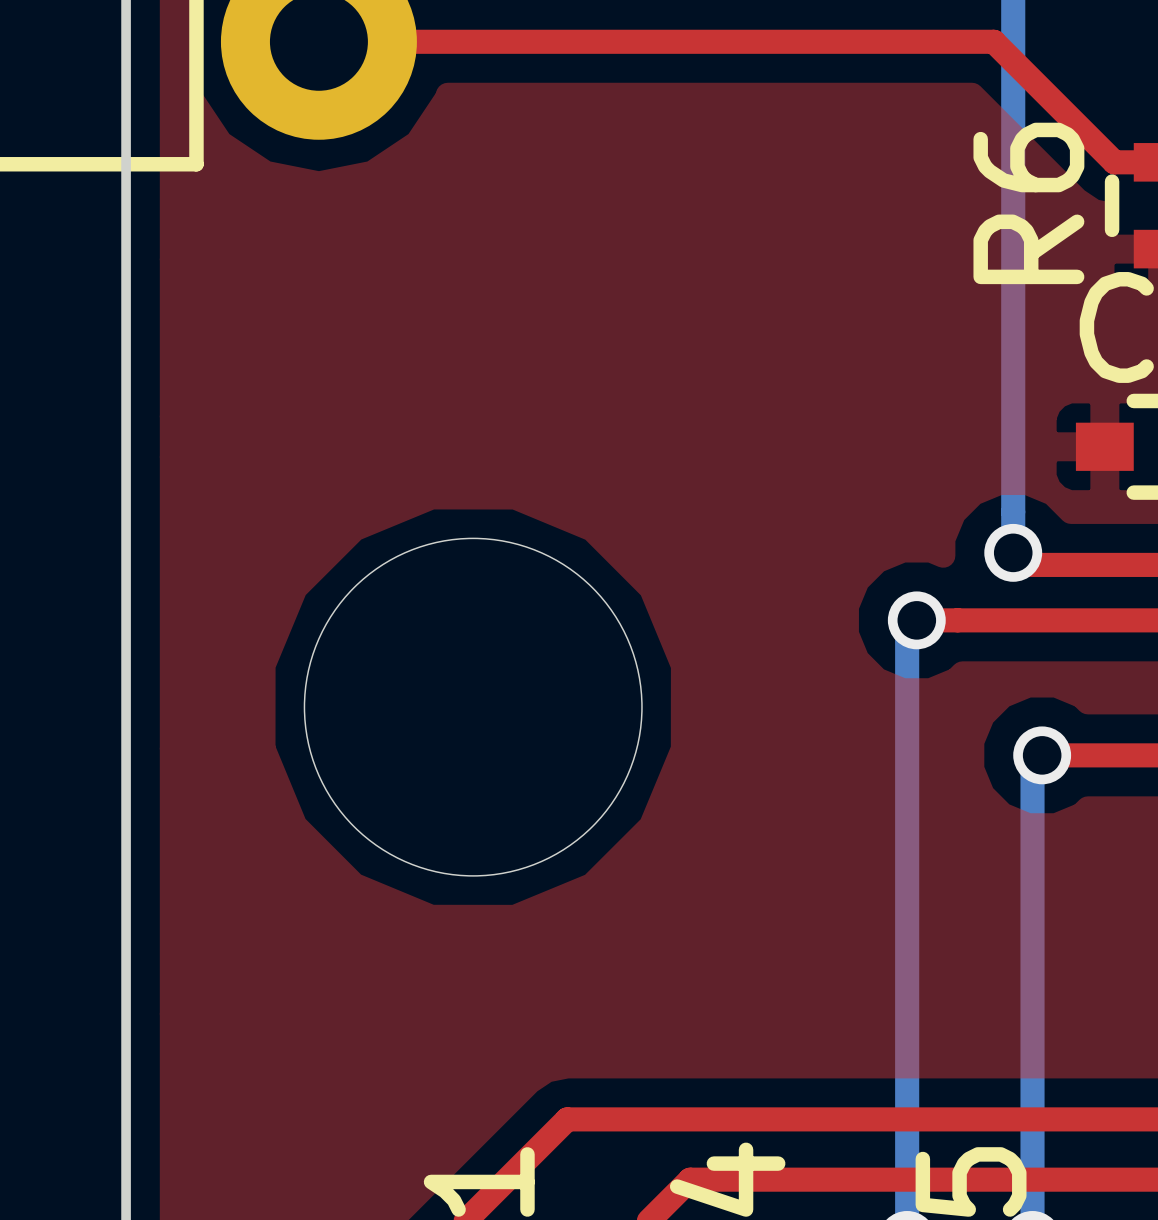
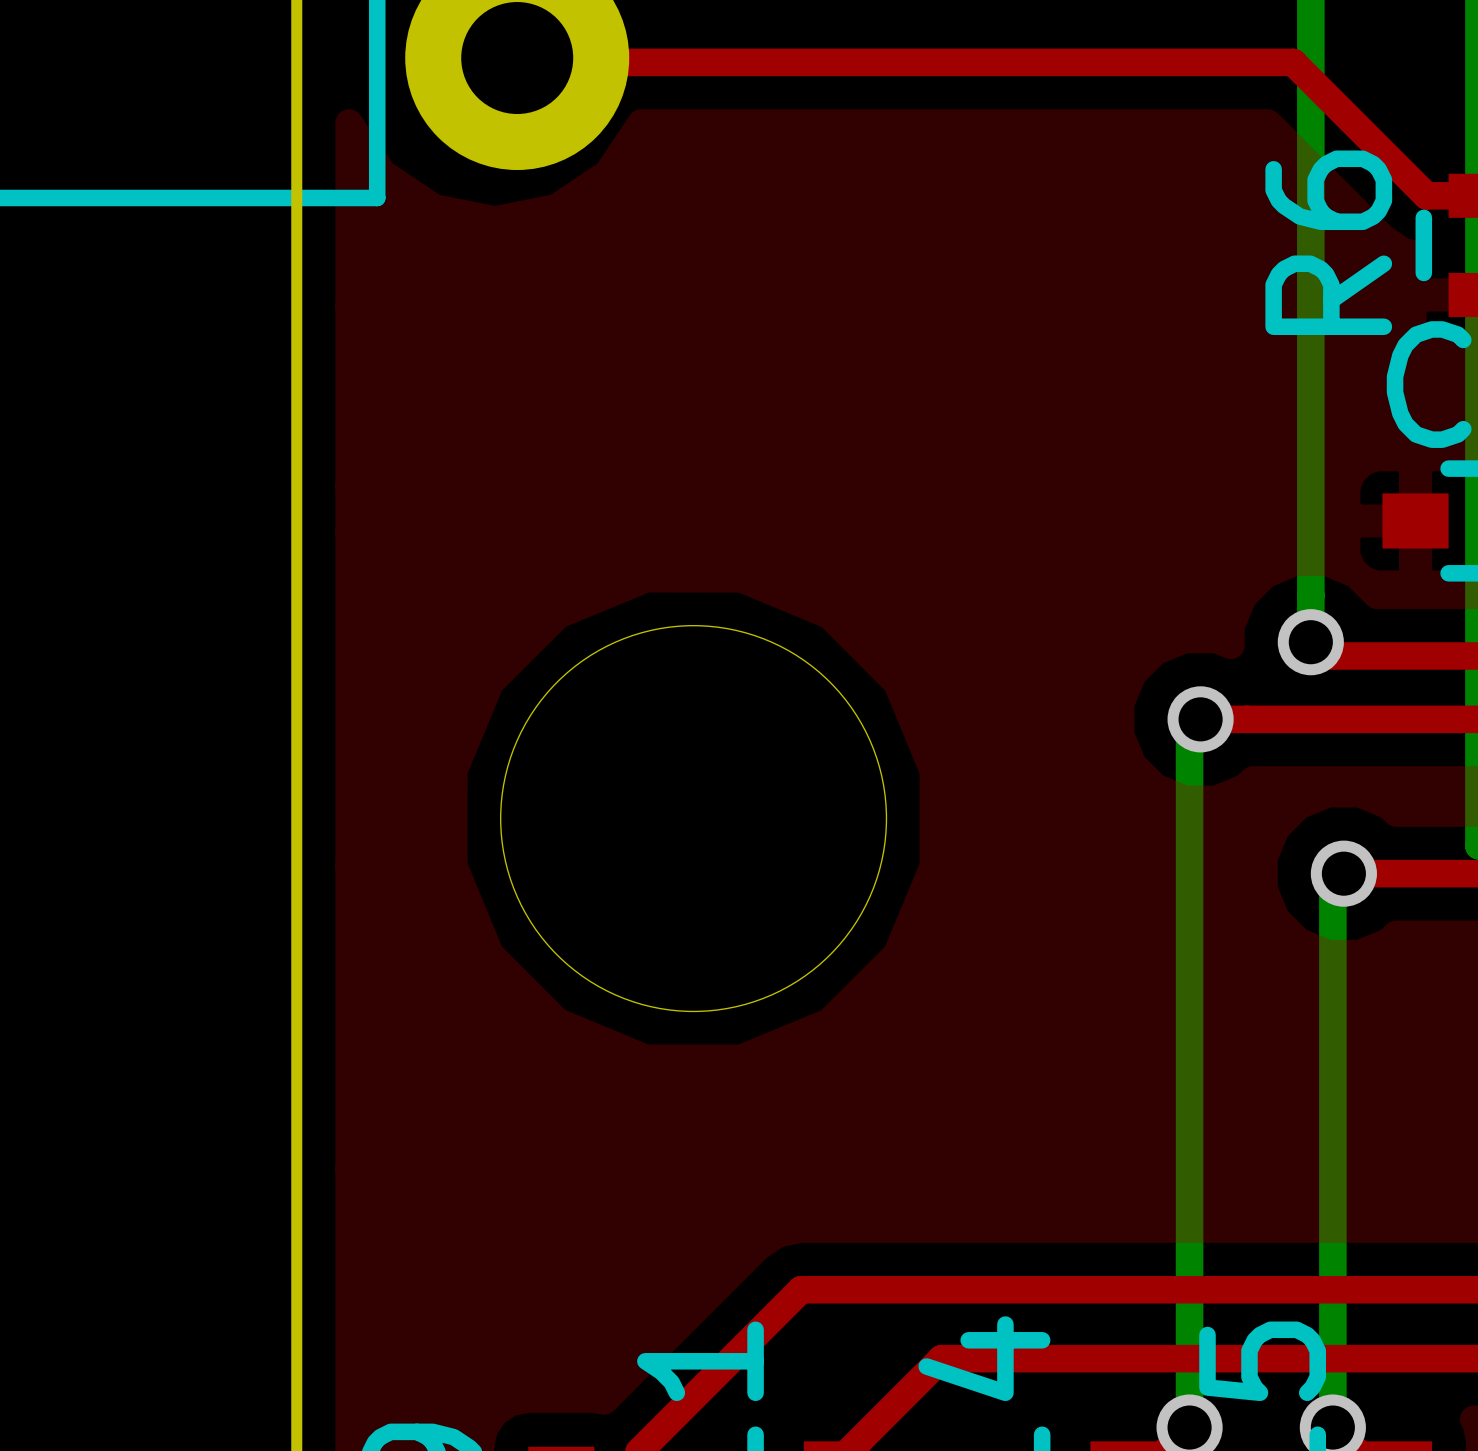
top track: (318, 41) (993, 41) (997, 45) -> (499, 62) (1293, 62)

